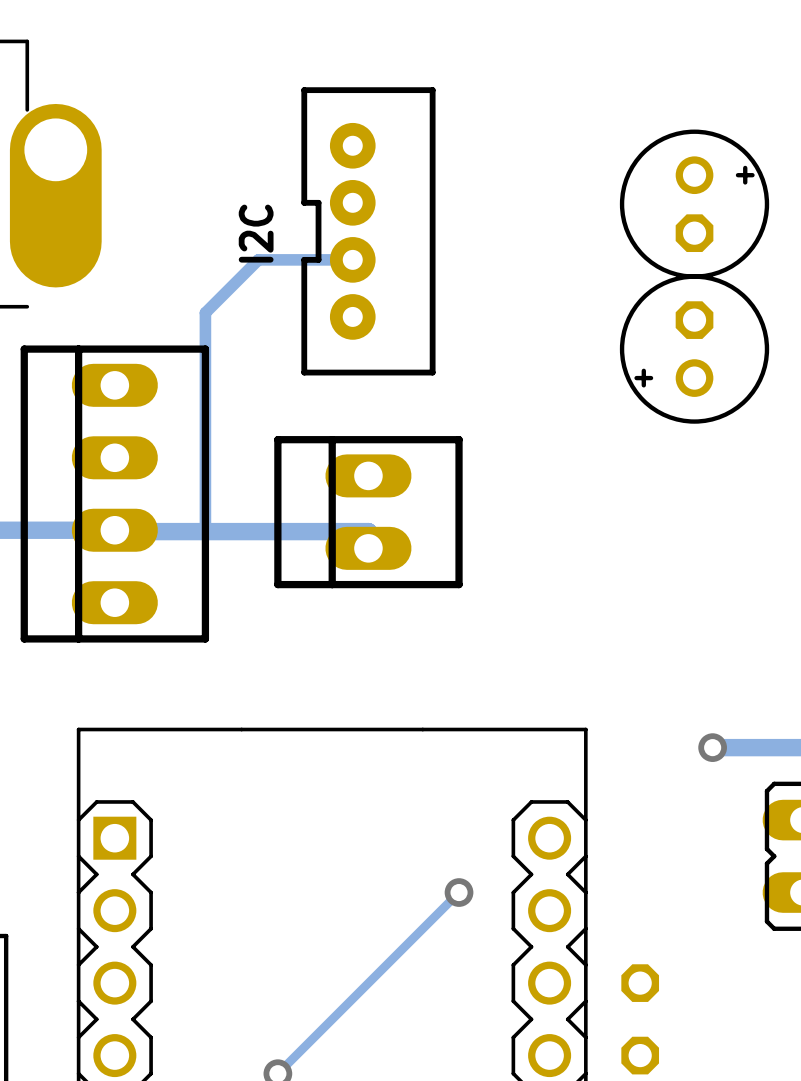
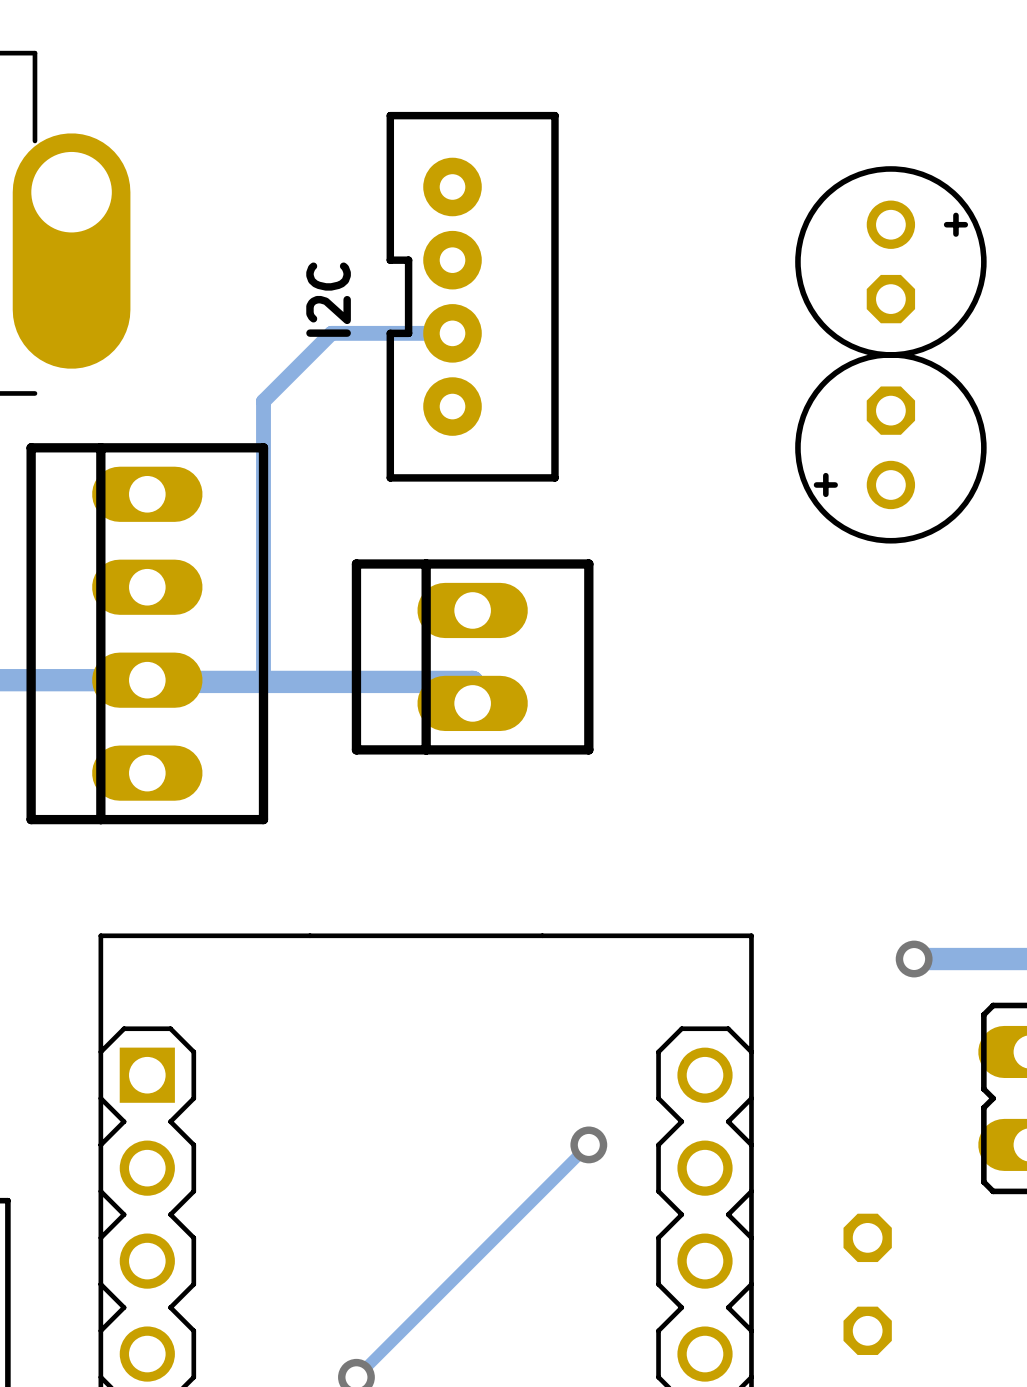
part position: (640, 1019) -> (867, 1284)

